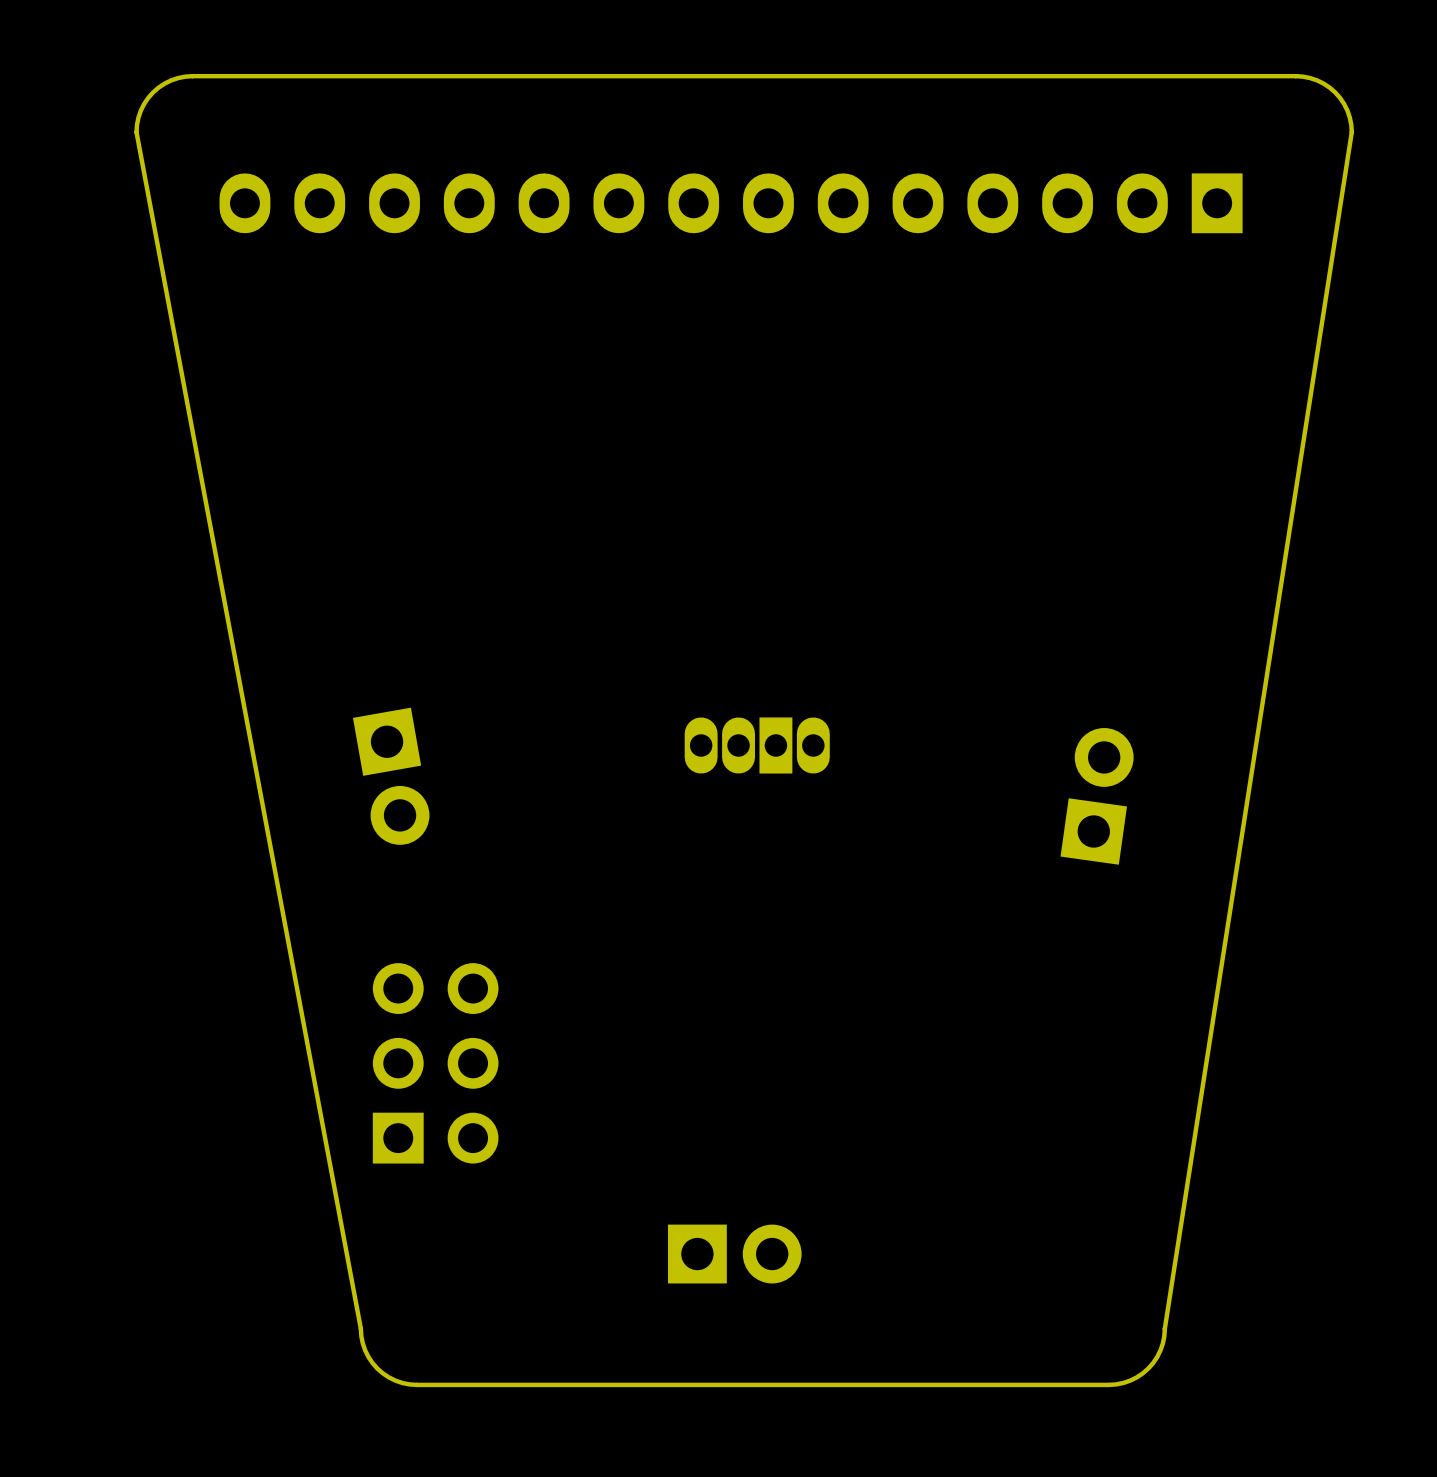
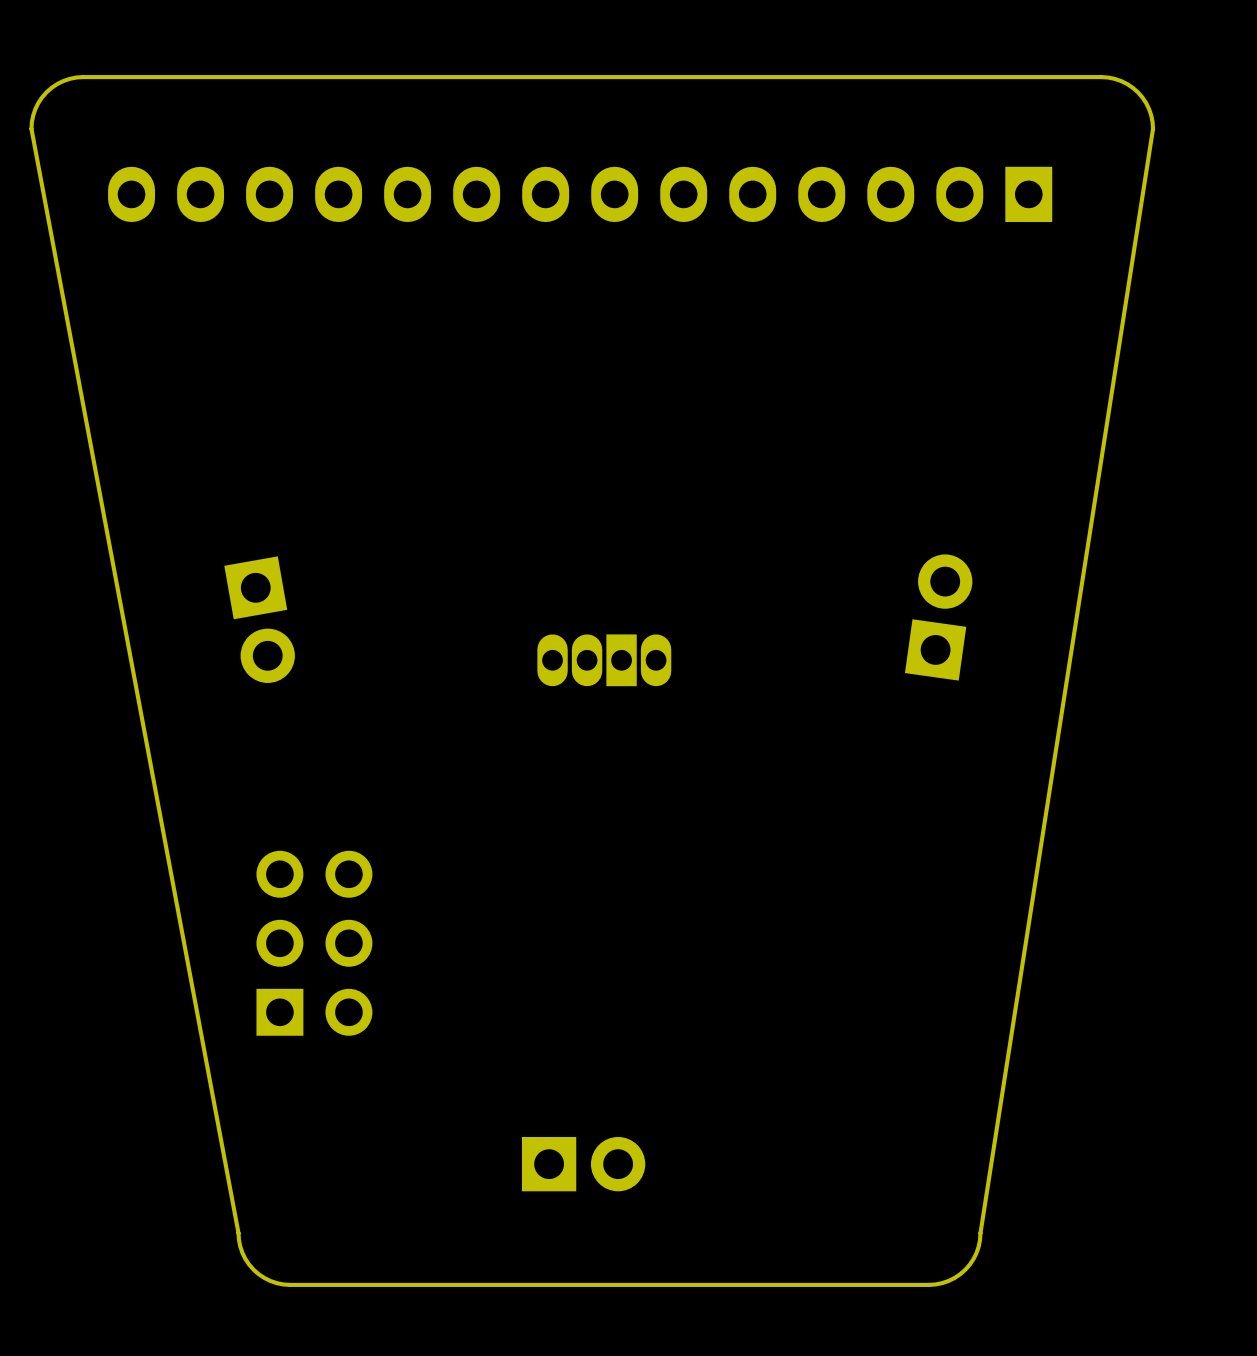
part position: (757, 745) -> (604, 660)
part position: (391, 776) -> (259, 619)
part position: (1097, 796) -> (938, 617)
part position: (435, 1063) -> (314, 943)

